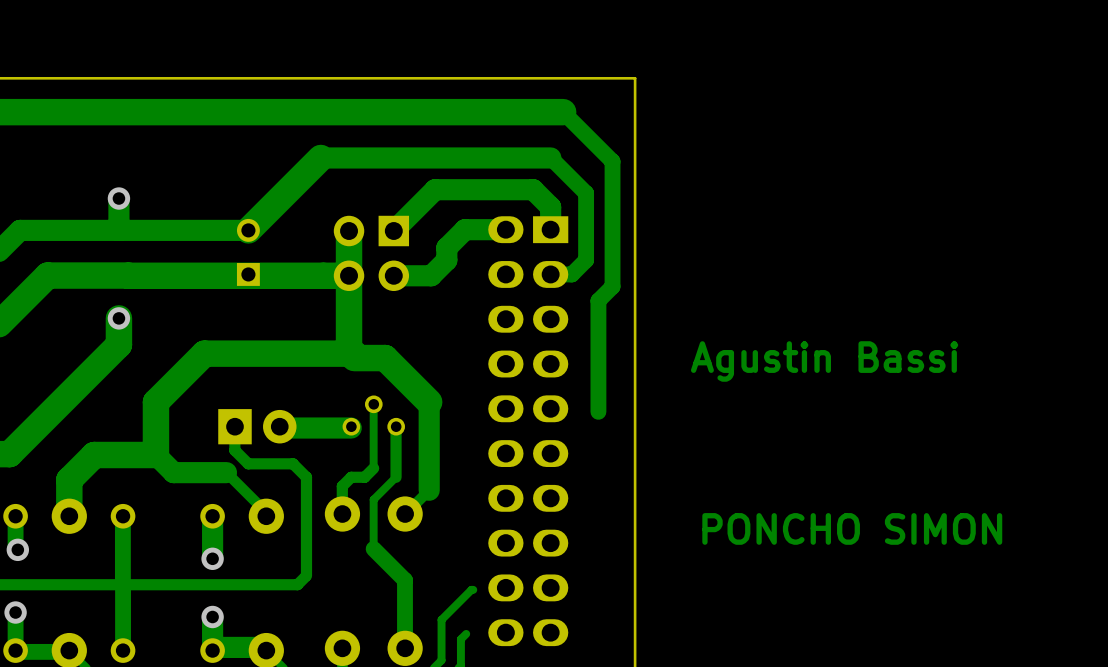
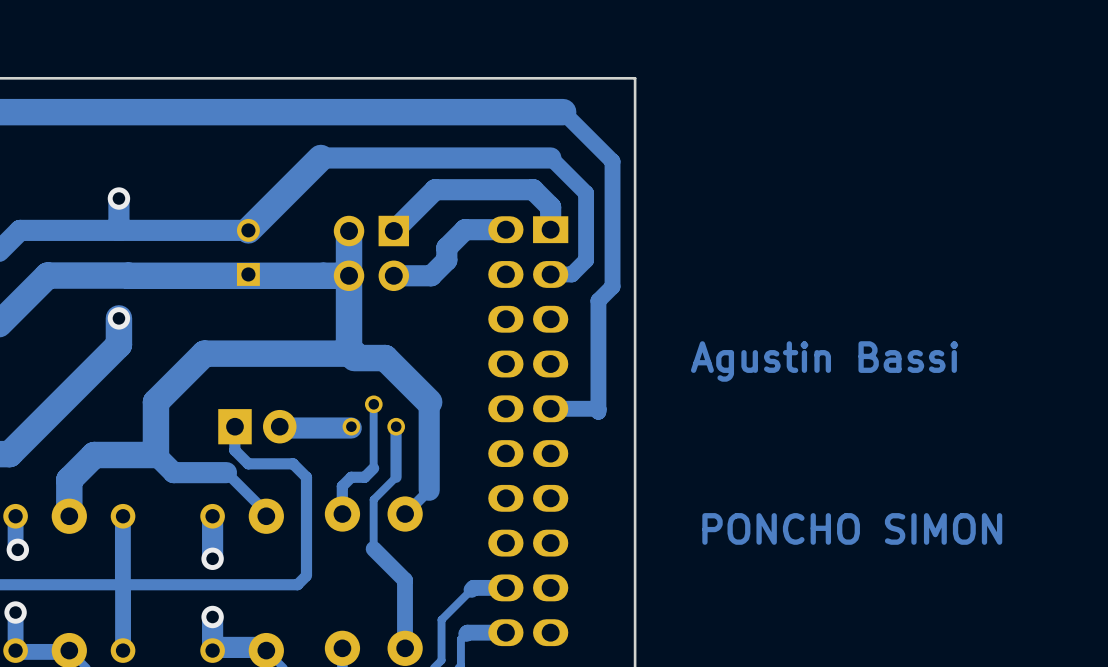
track: none -> (598, 408) (550, 408)
track: none -> (505, 587) (473, 587) (471, 589)
track: none -> (505, 632) (466, 633)

